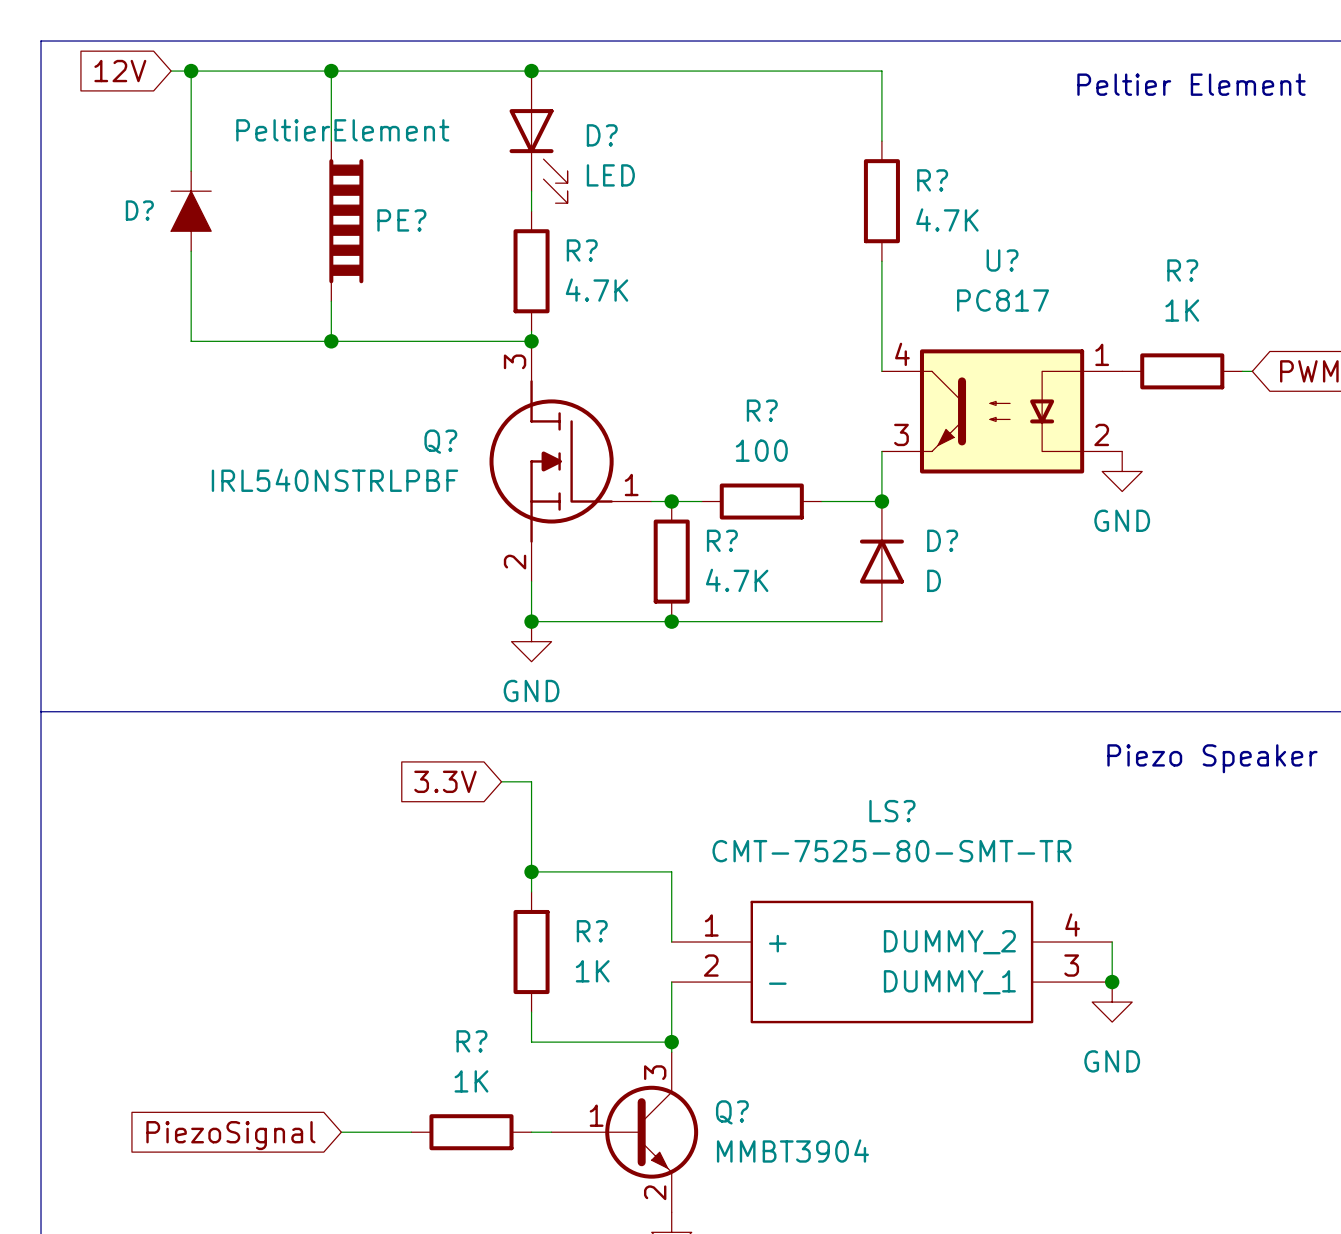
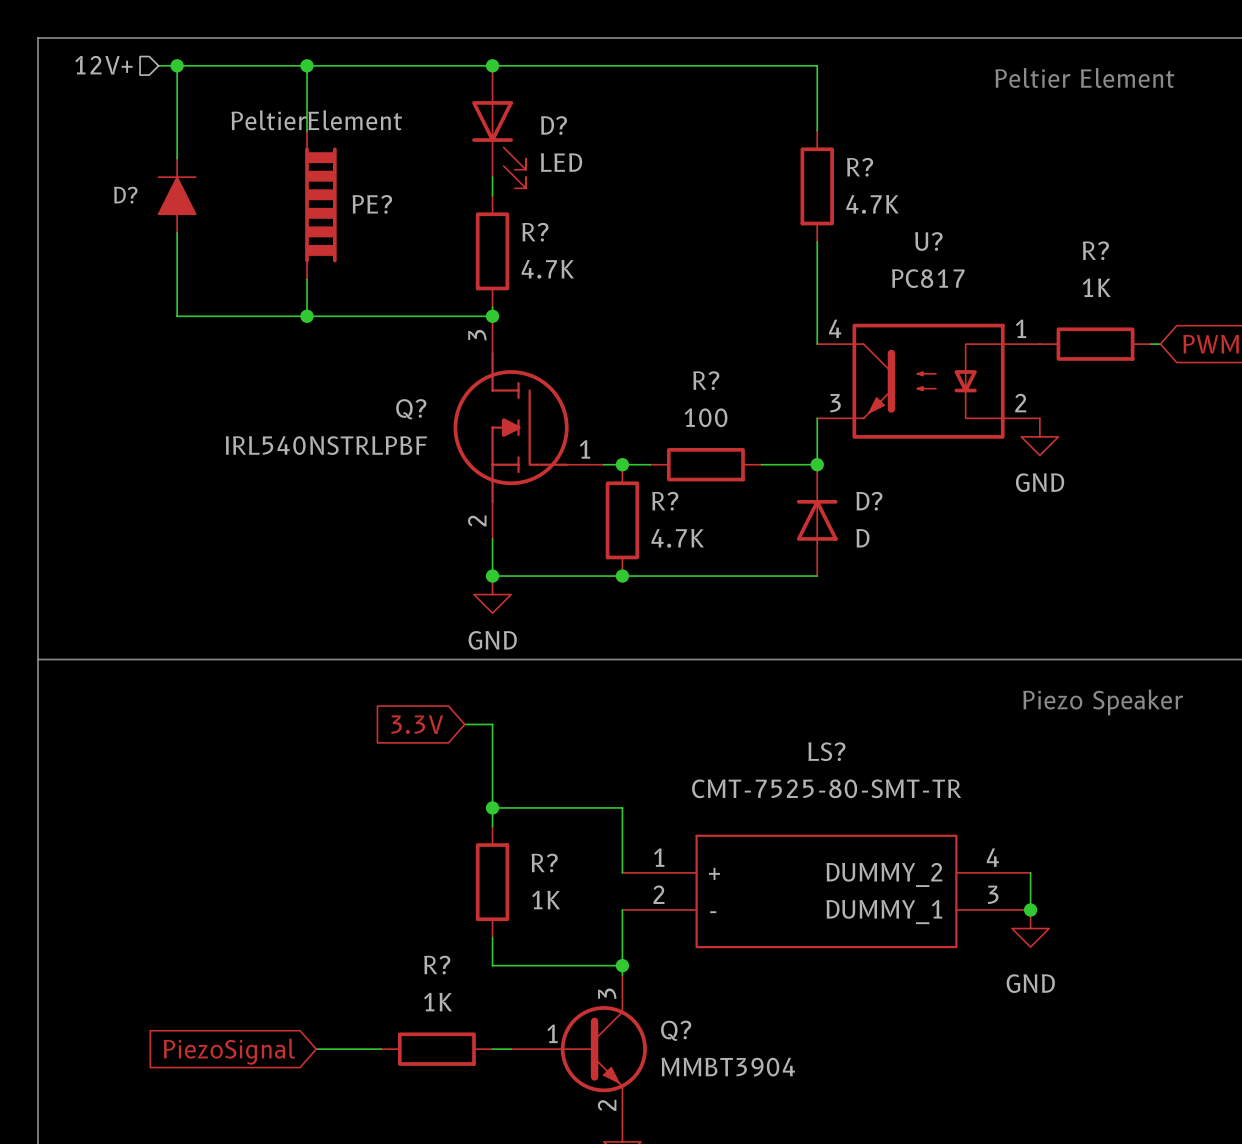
hierarchical label: none -> 12V+ (103, 65)
global label: 12V (120, 71) -> none

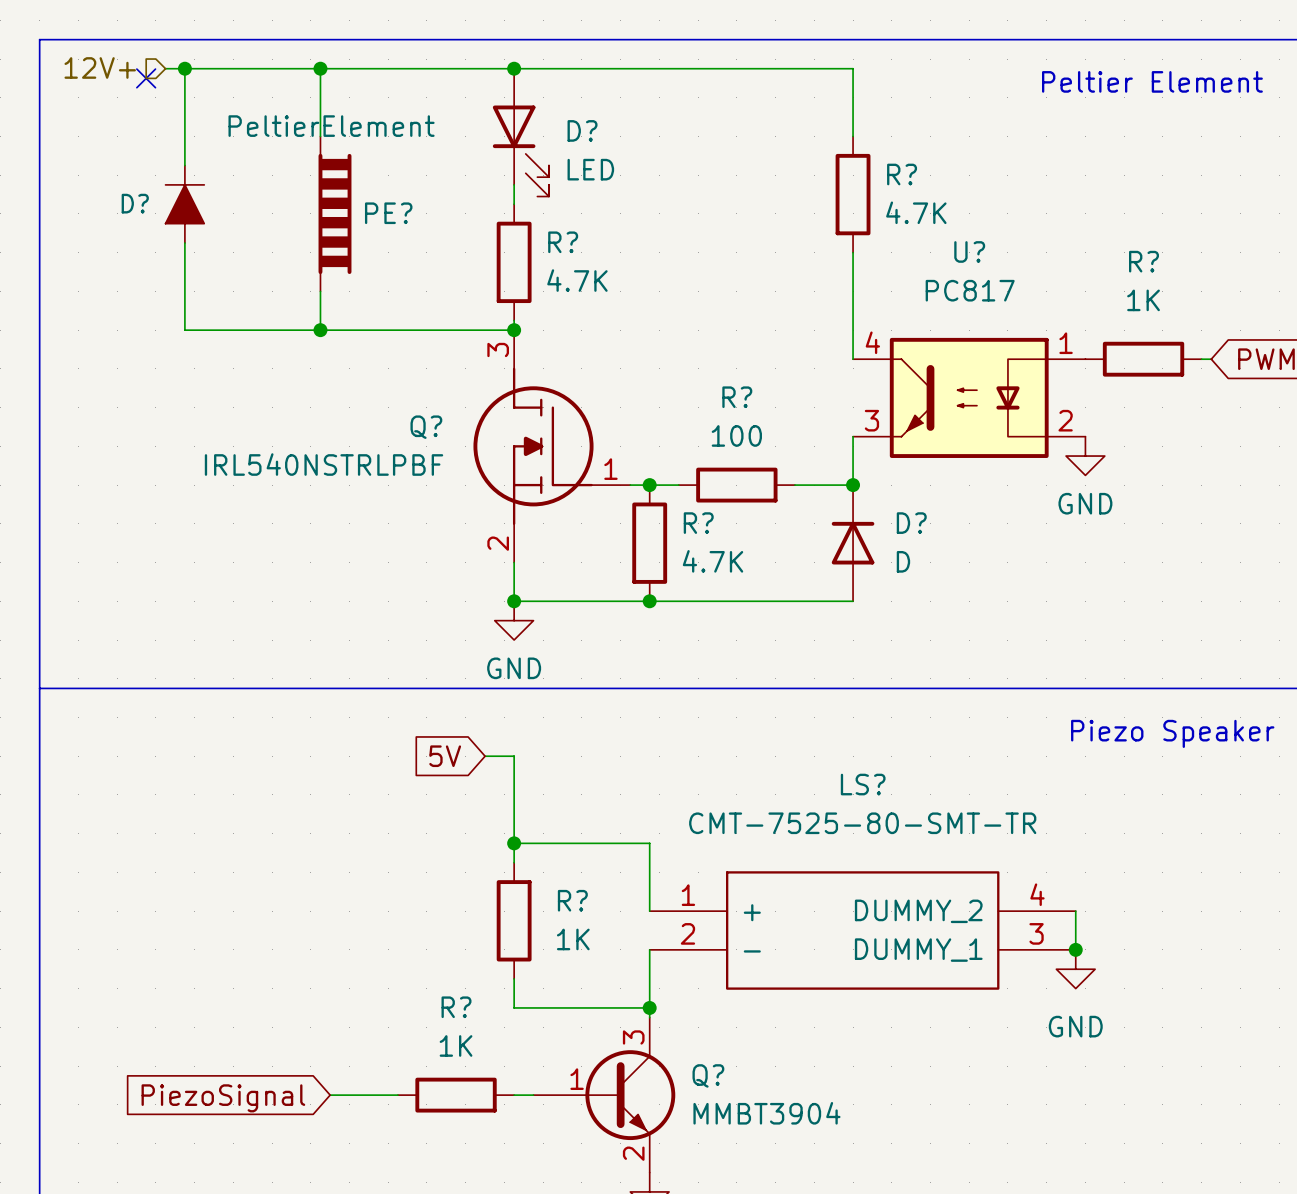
no-connect mark: none -> (146, 78)
global label: 3.3V (417, 724) -> 5V (445, 756)

